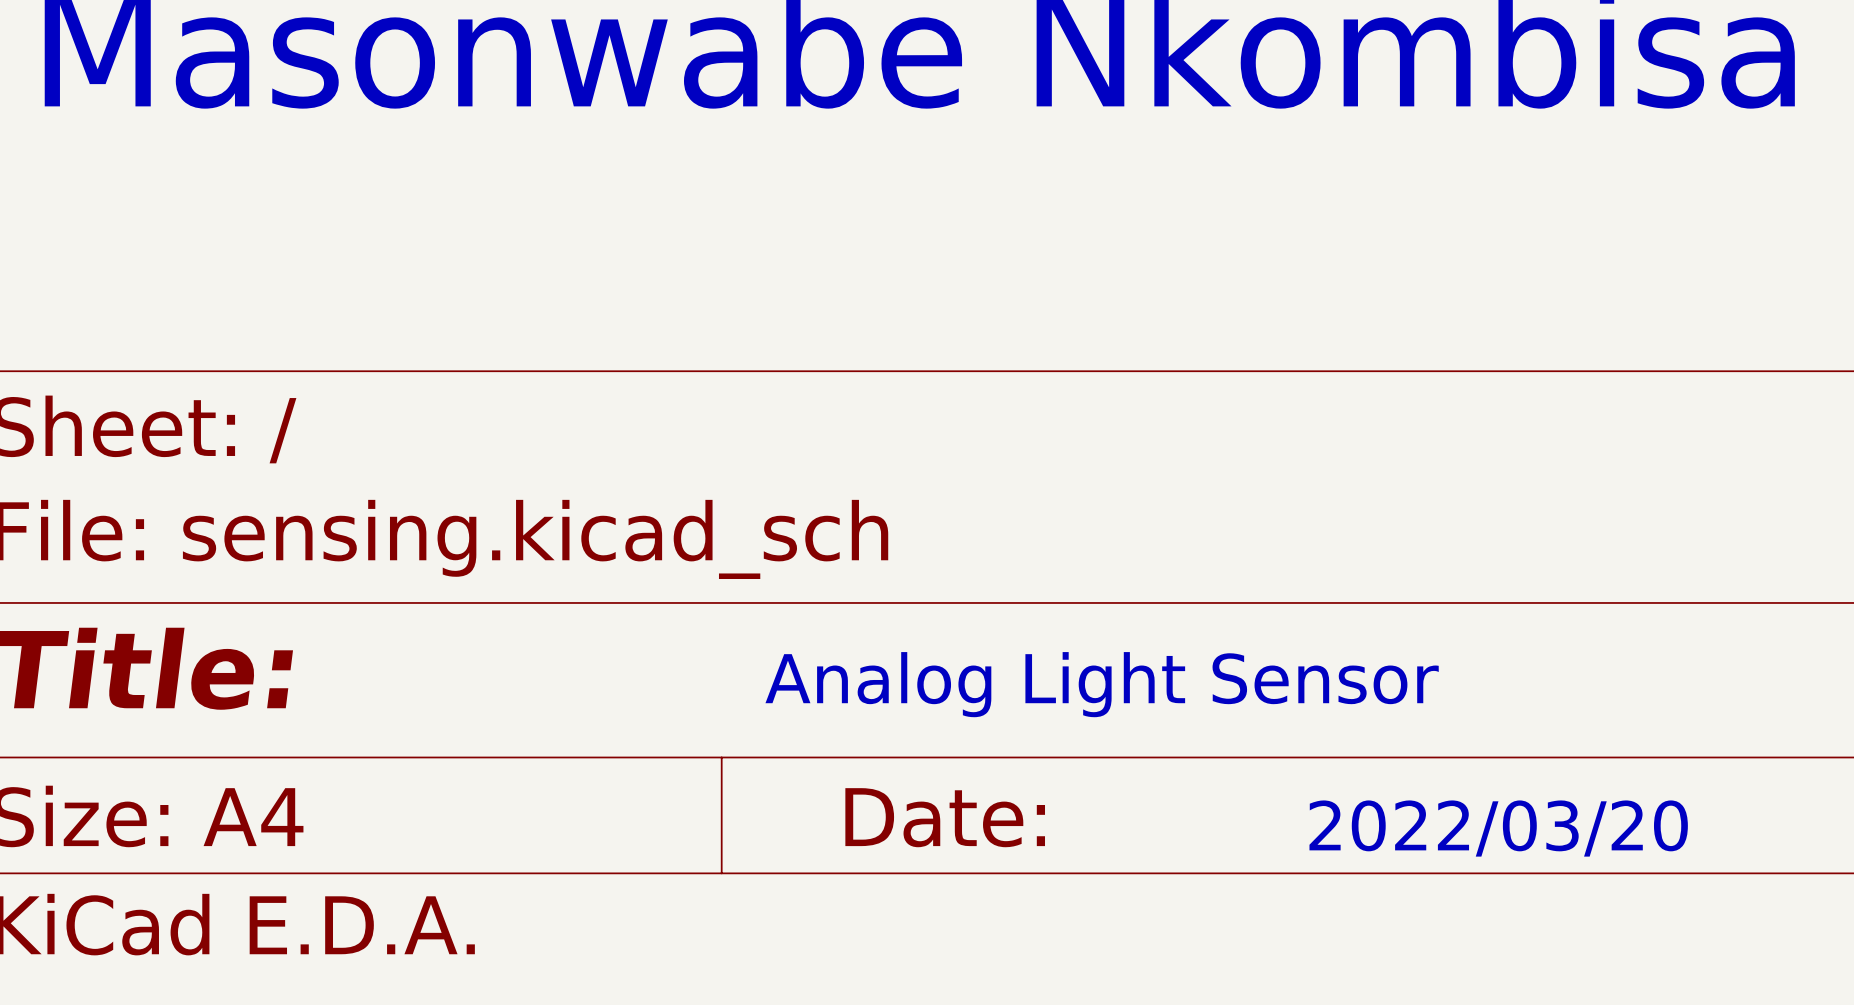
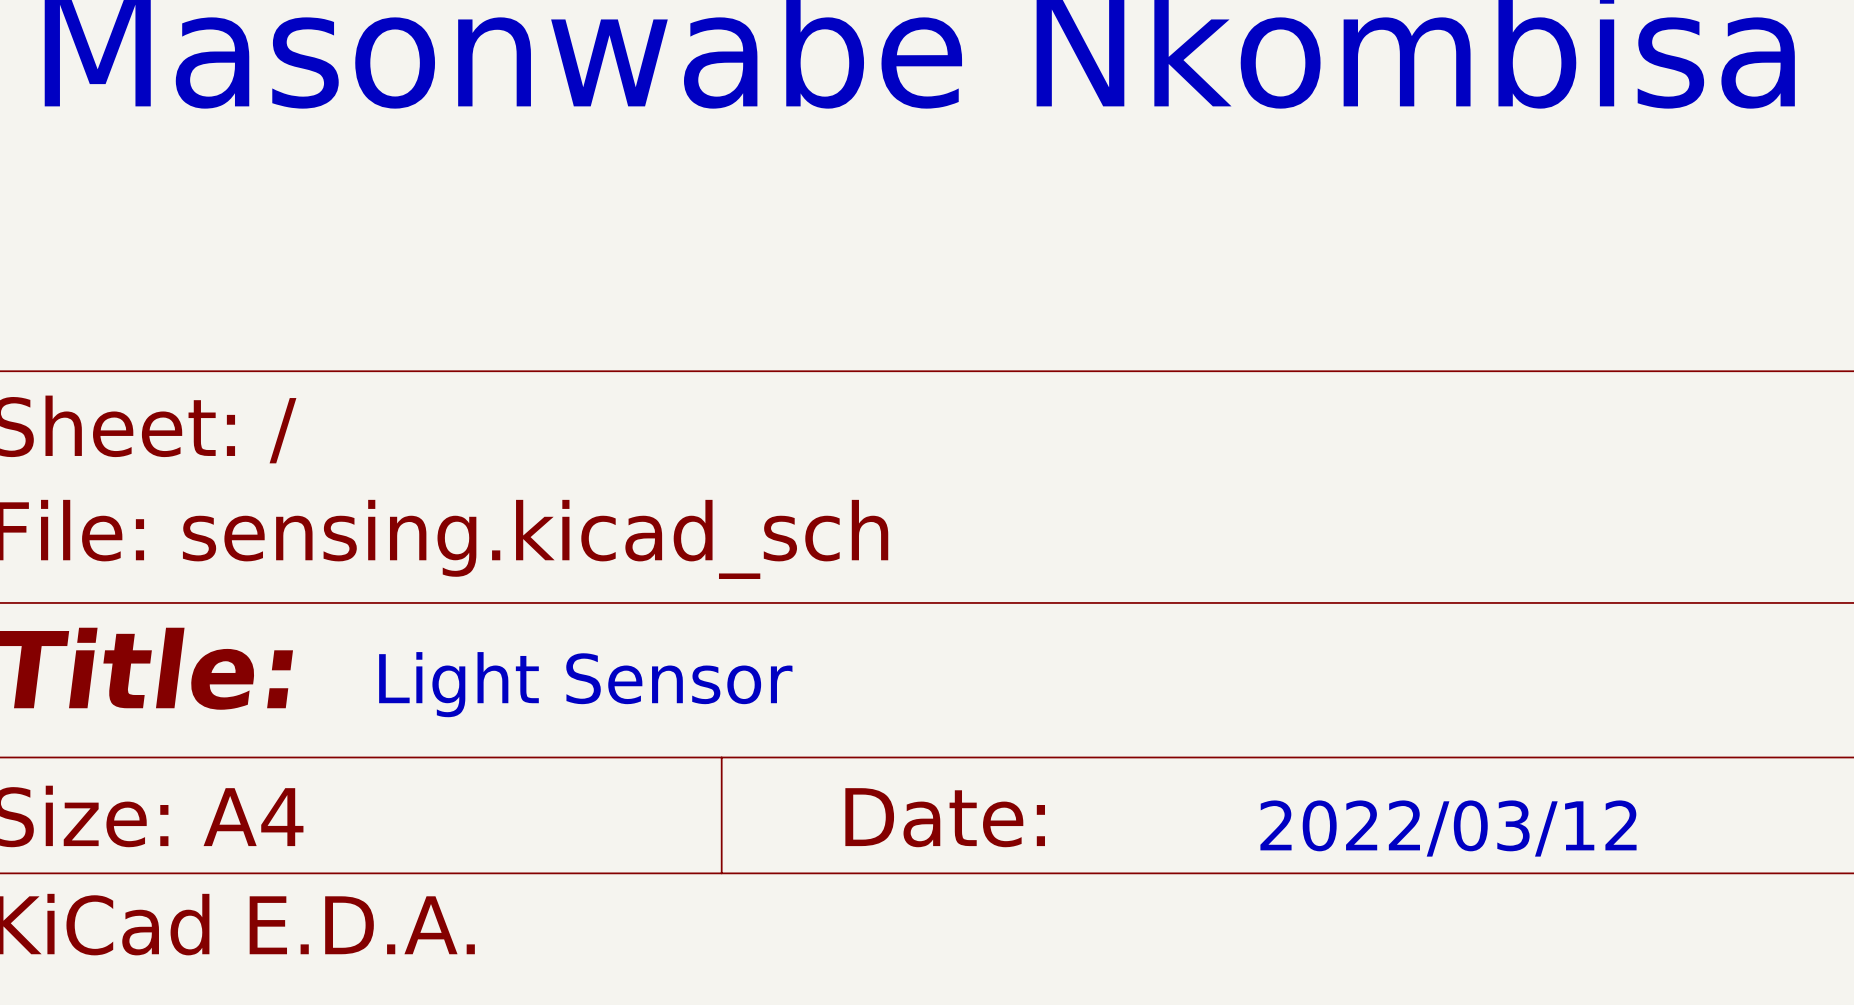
text: Analog Light Sensor (1102, 684) -> Light Sensor (585, 684)
text: 2022/03/20 (1498, 828) -> 2022/03/12 (1448, 828)

